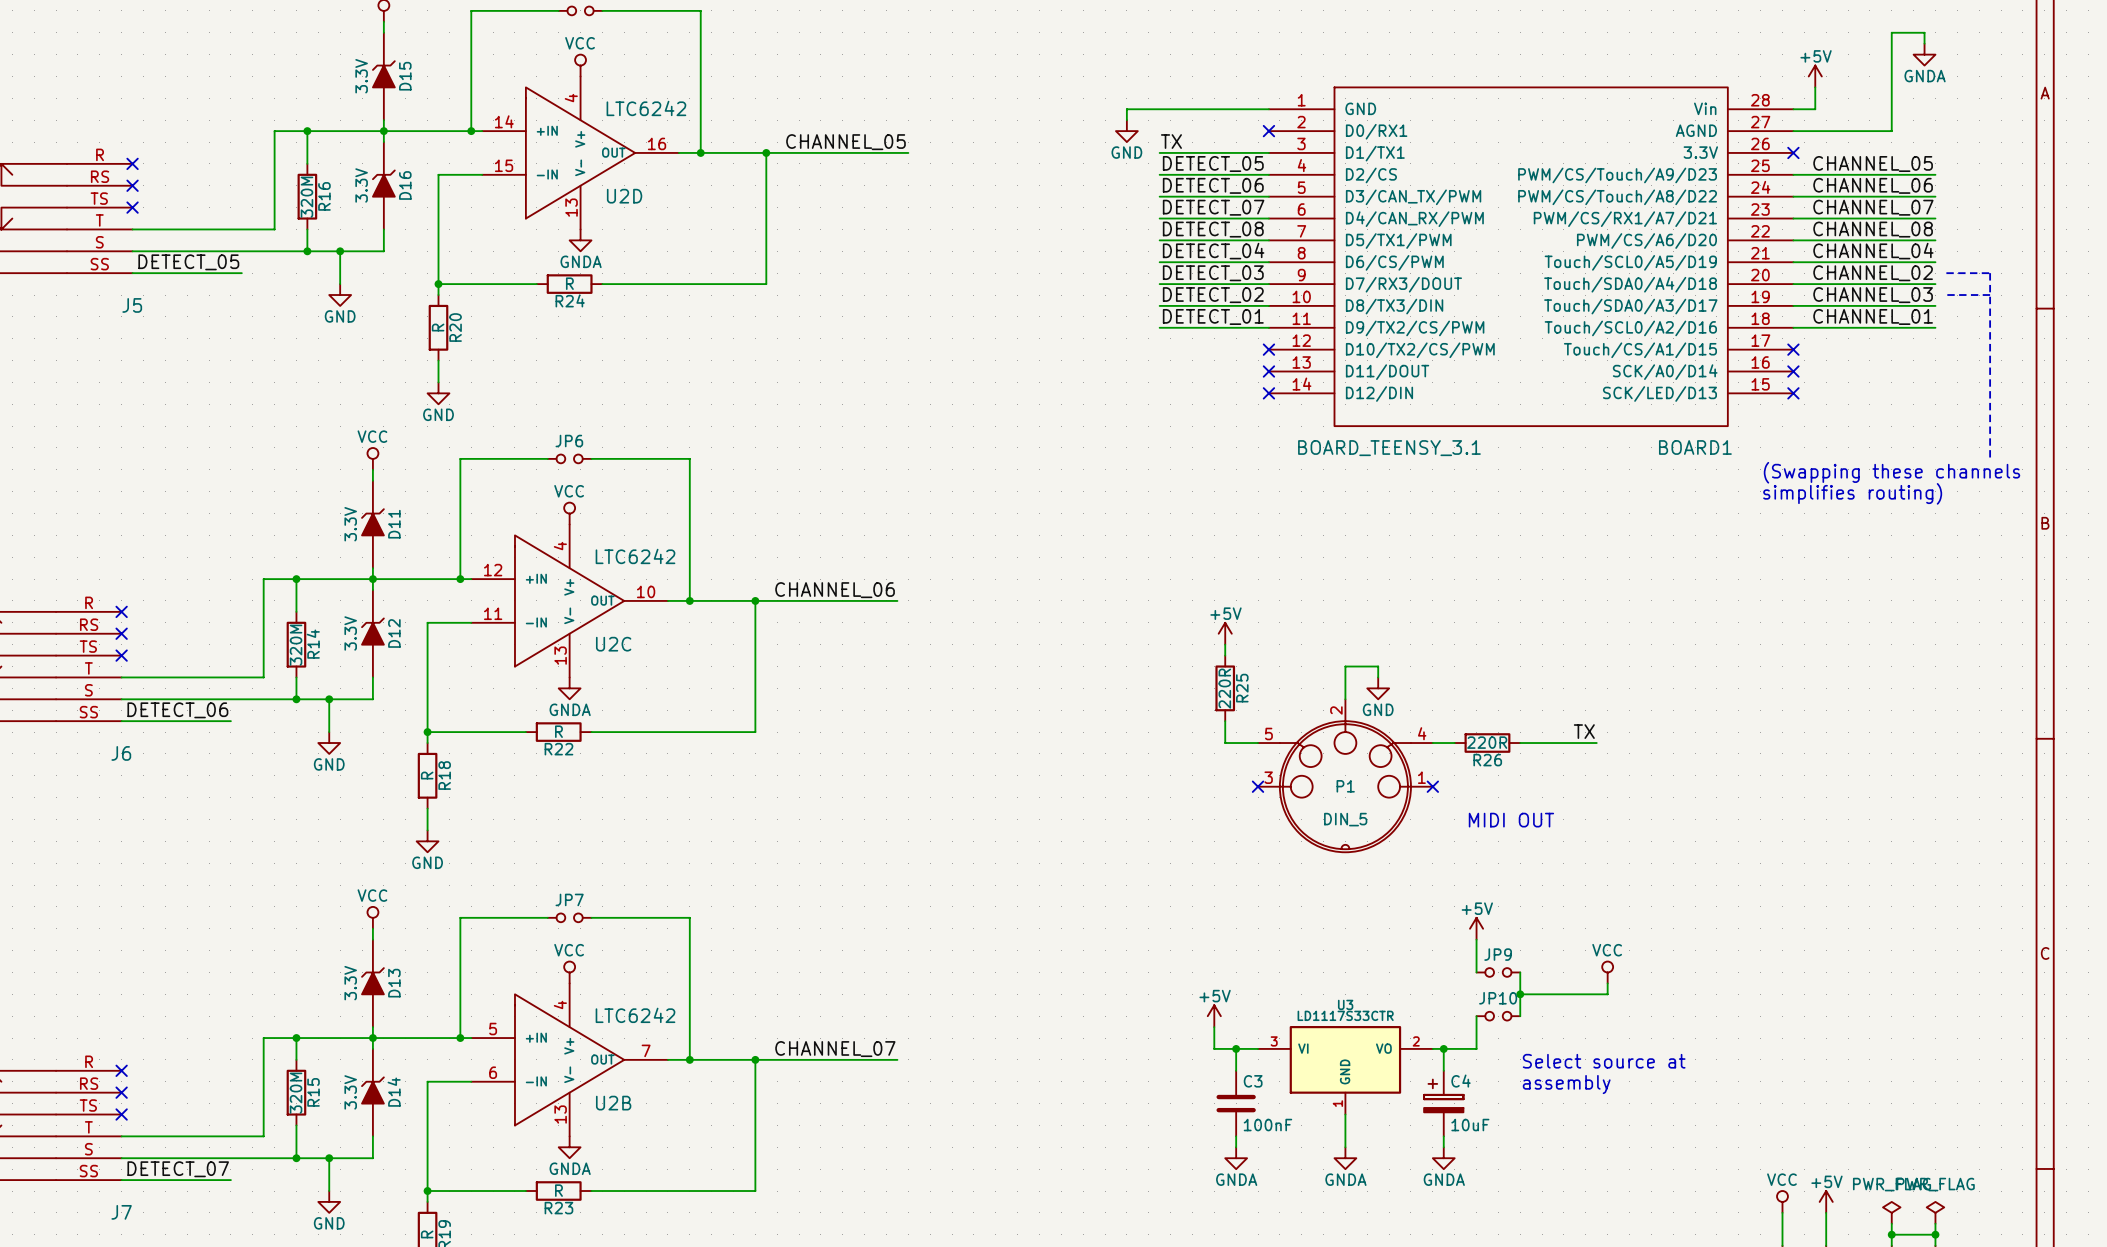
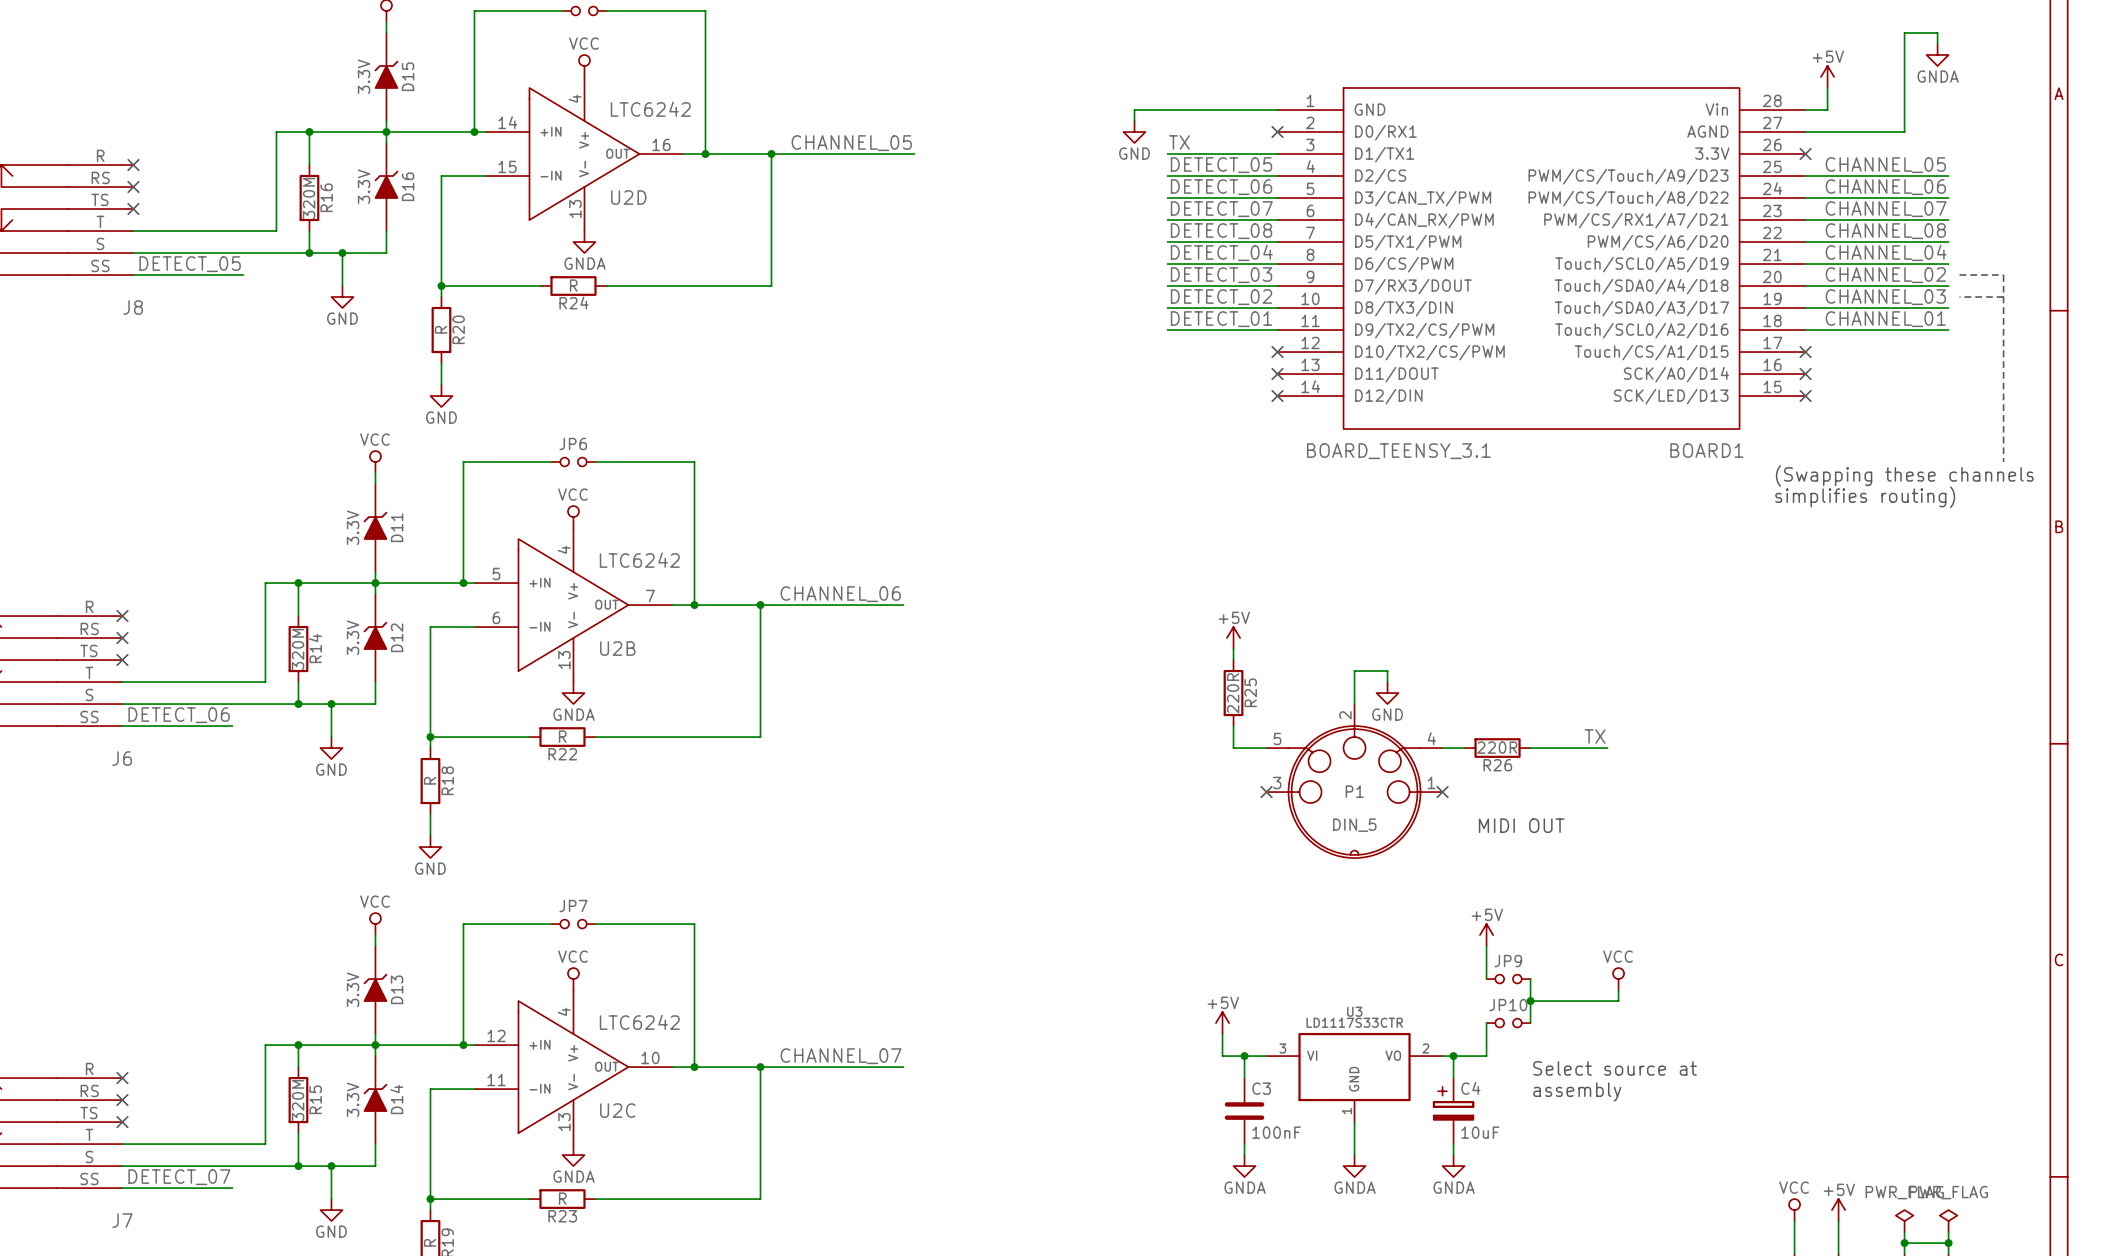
J5 name: J5 (132, 305) -> J8 (133, 307)
U2C position: (569, 600) -> (573, 1067)
U2B position: (569, 1059) -> (573, 605)

